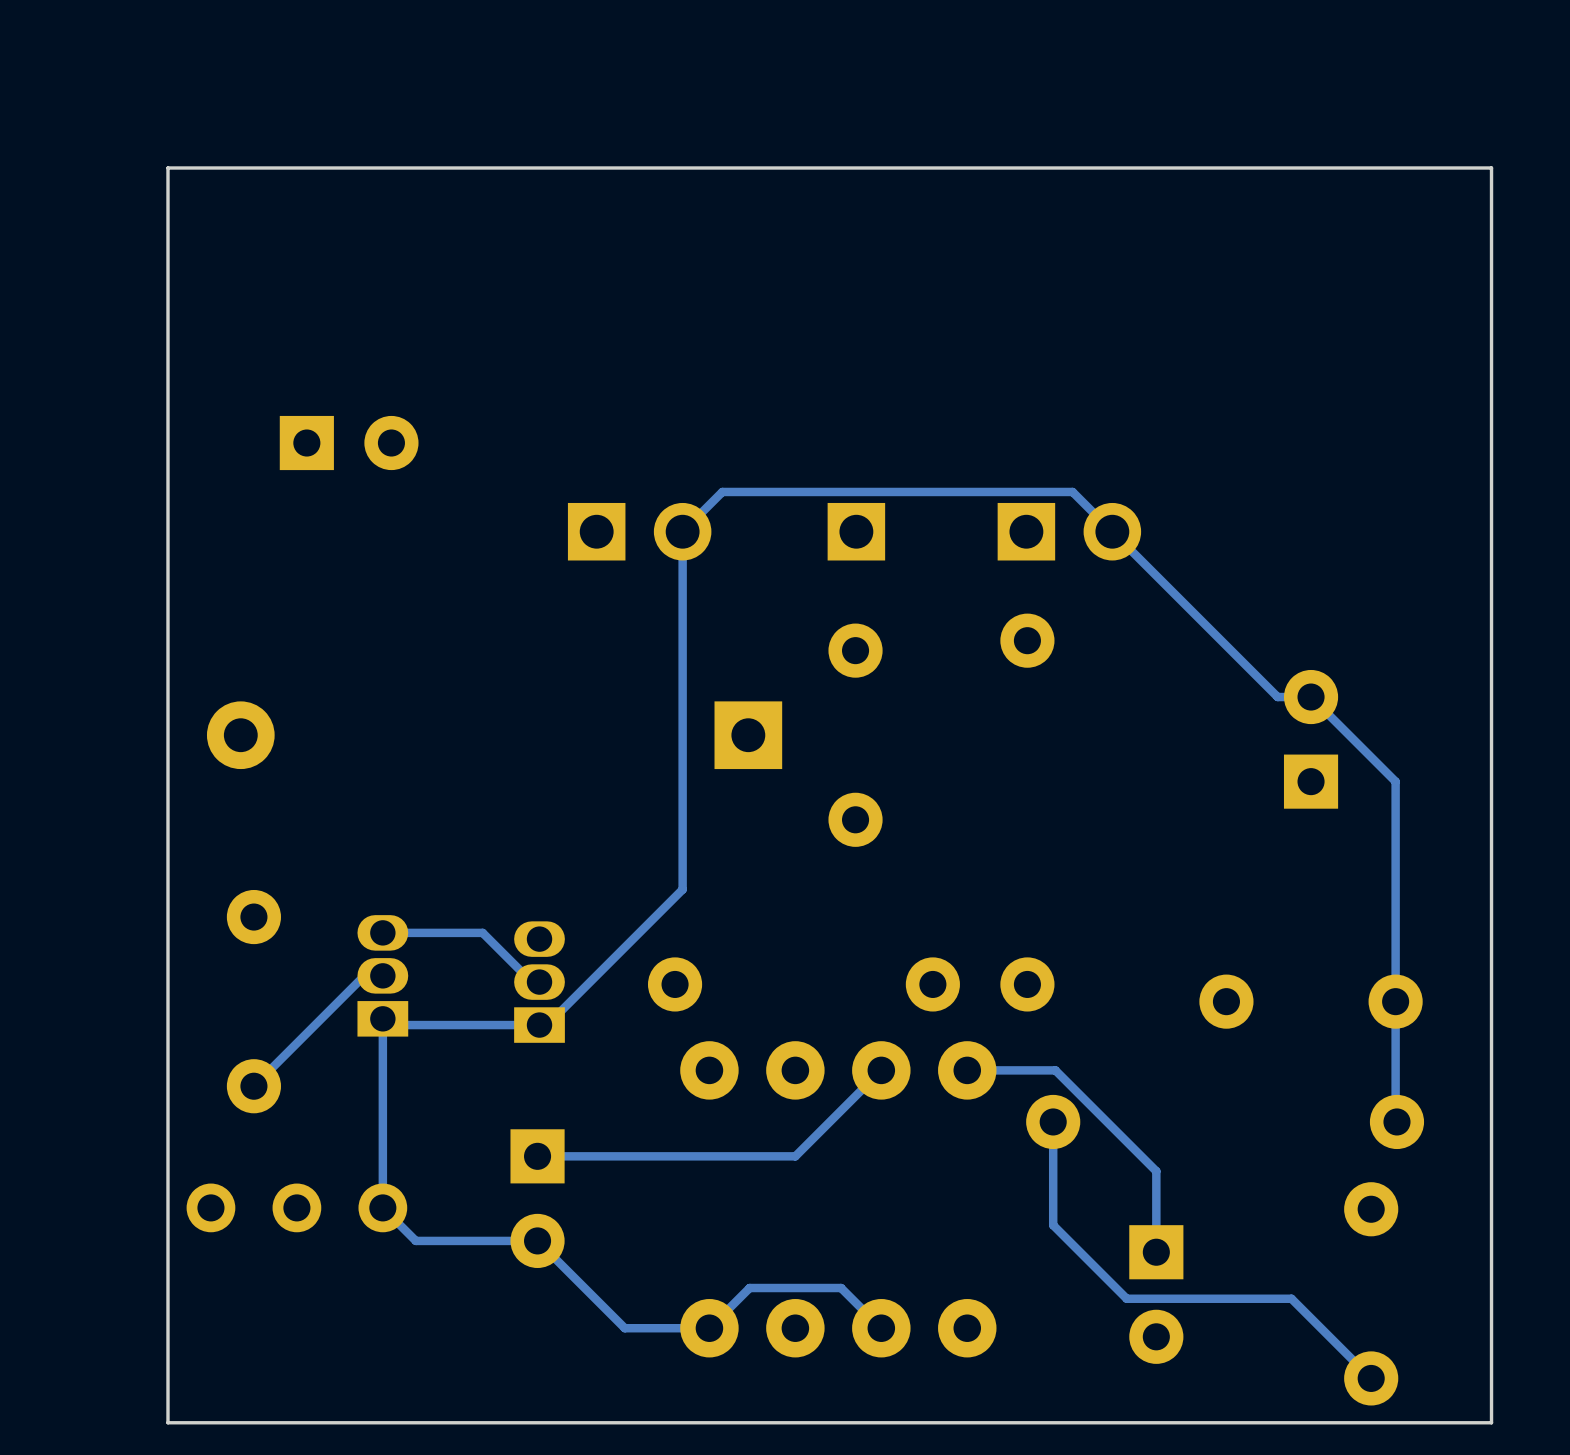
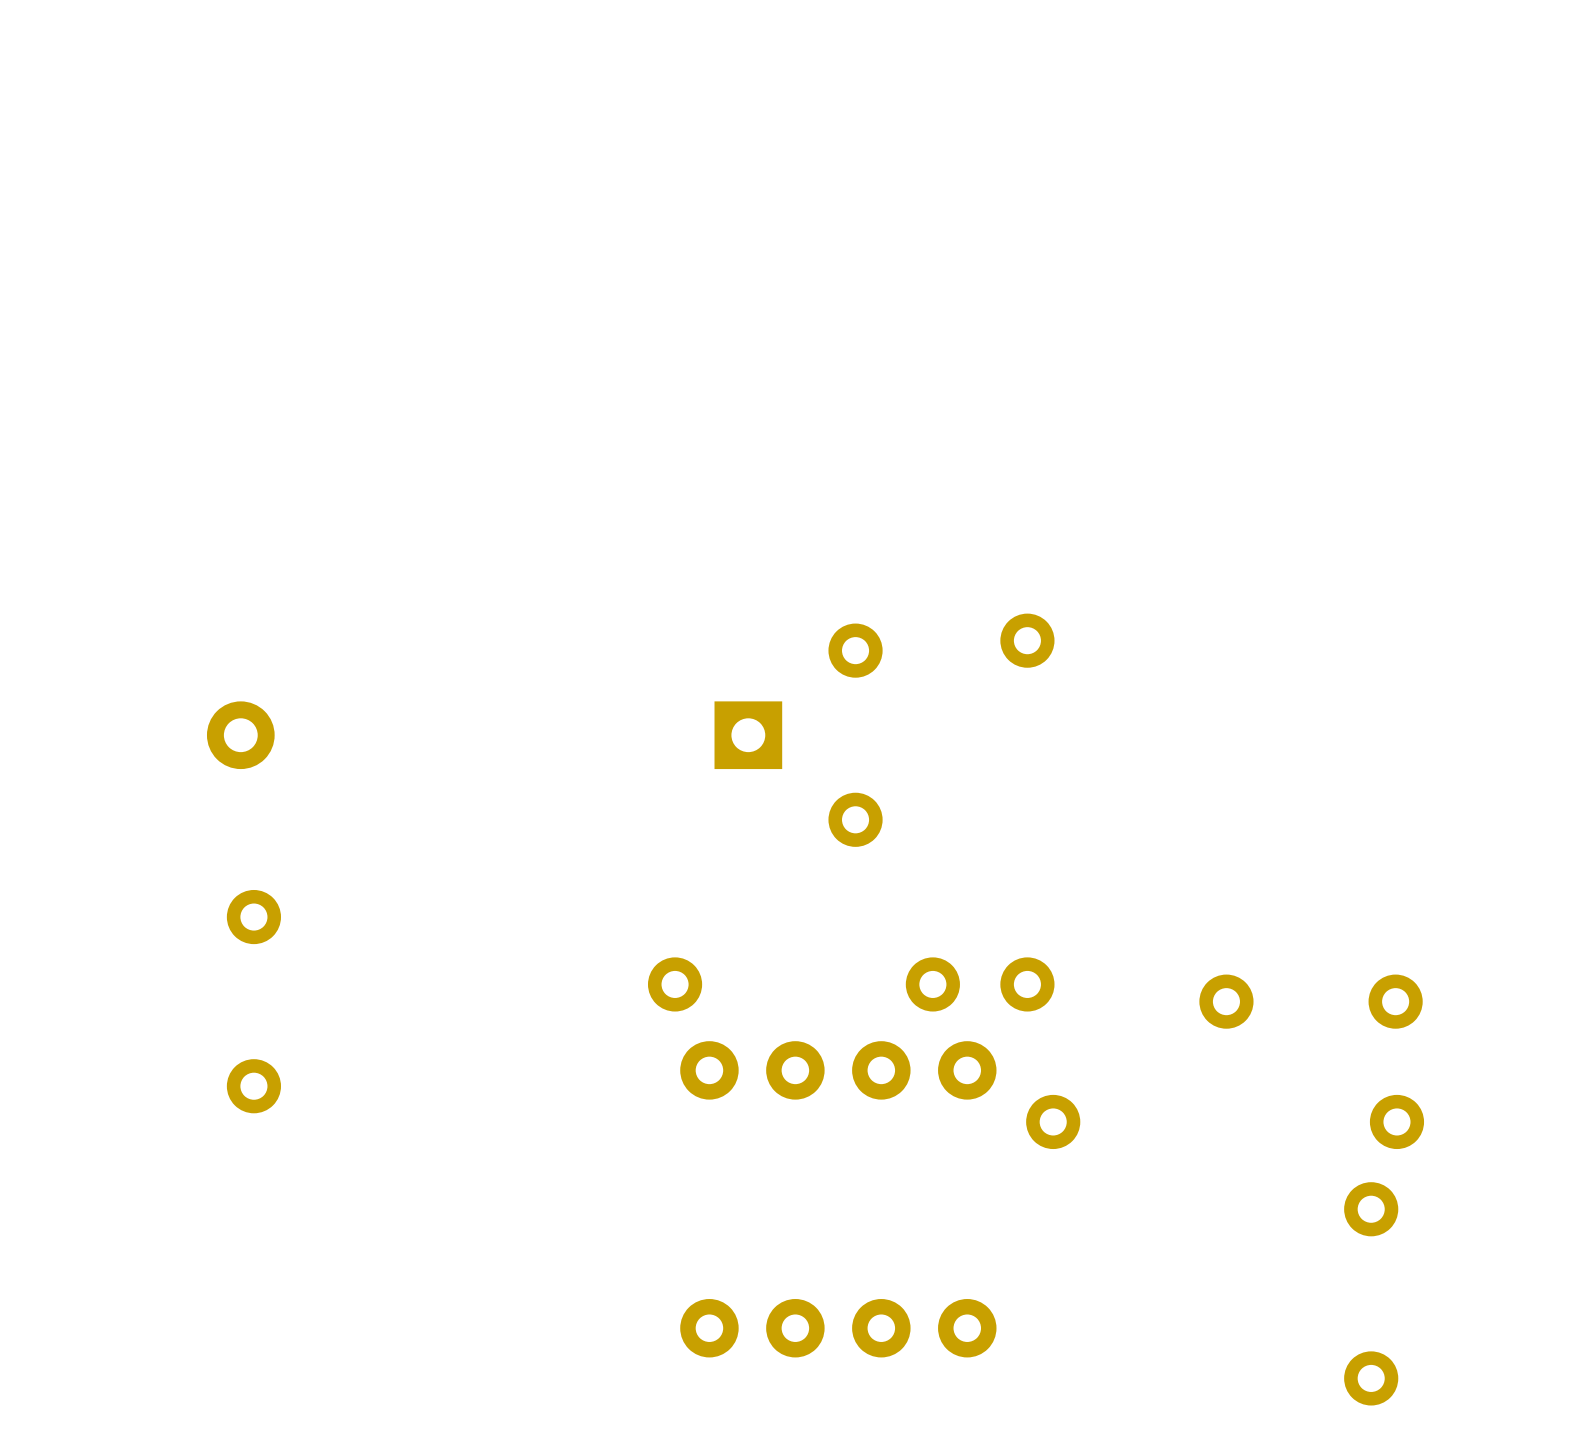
board edge: (1491, 167) (167, 167) (167, 1422) (1491, 1422) (1491, 167) -> none
part: (349, 443) -> none
part: (639, 531) -> none
part: (856, 531) -> none
part: (1069, 531) -> none
part: (1311, 739) -> none
track: (382, 932) (482, 932) (531, 982) (539, 982) -> none
track: (382, 975) (364, 975) (253, 1086) -> none
part: (382, 975) -> none
part: (539, 982) -> none
track: (881, 1070) (795, 1156) (537, 1156) -> none
track: (967, 1070) (1055, 1070) (1156, 1171) (1156, 1252) -> none
track: (1053, 1121) (1053, 1225) (1126, 1298) (1291, 1298) (1371, 1378) -> none
track: (1396, 1121) (1395, 781) (1311, 697) (1277, 697) (1072, 491) (722, 491) (682, 531) (682, 889) (547, 1025) (389, 1025) (382, 1018) (382, 1207) (415, 1240) (537, 1240) (624, 1328) (709, 1328) (749, 1288) (841, 1288) (881, 1328) -> none
part: (537, 1198) -> none
part: (296, 1207) -> none
part: (1156, 1294) -> none

